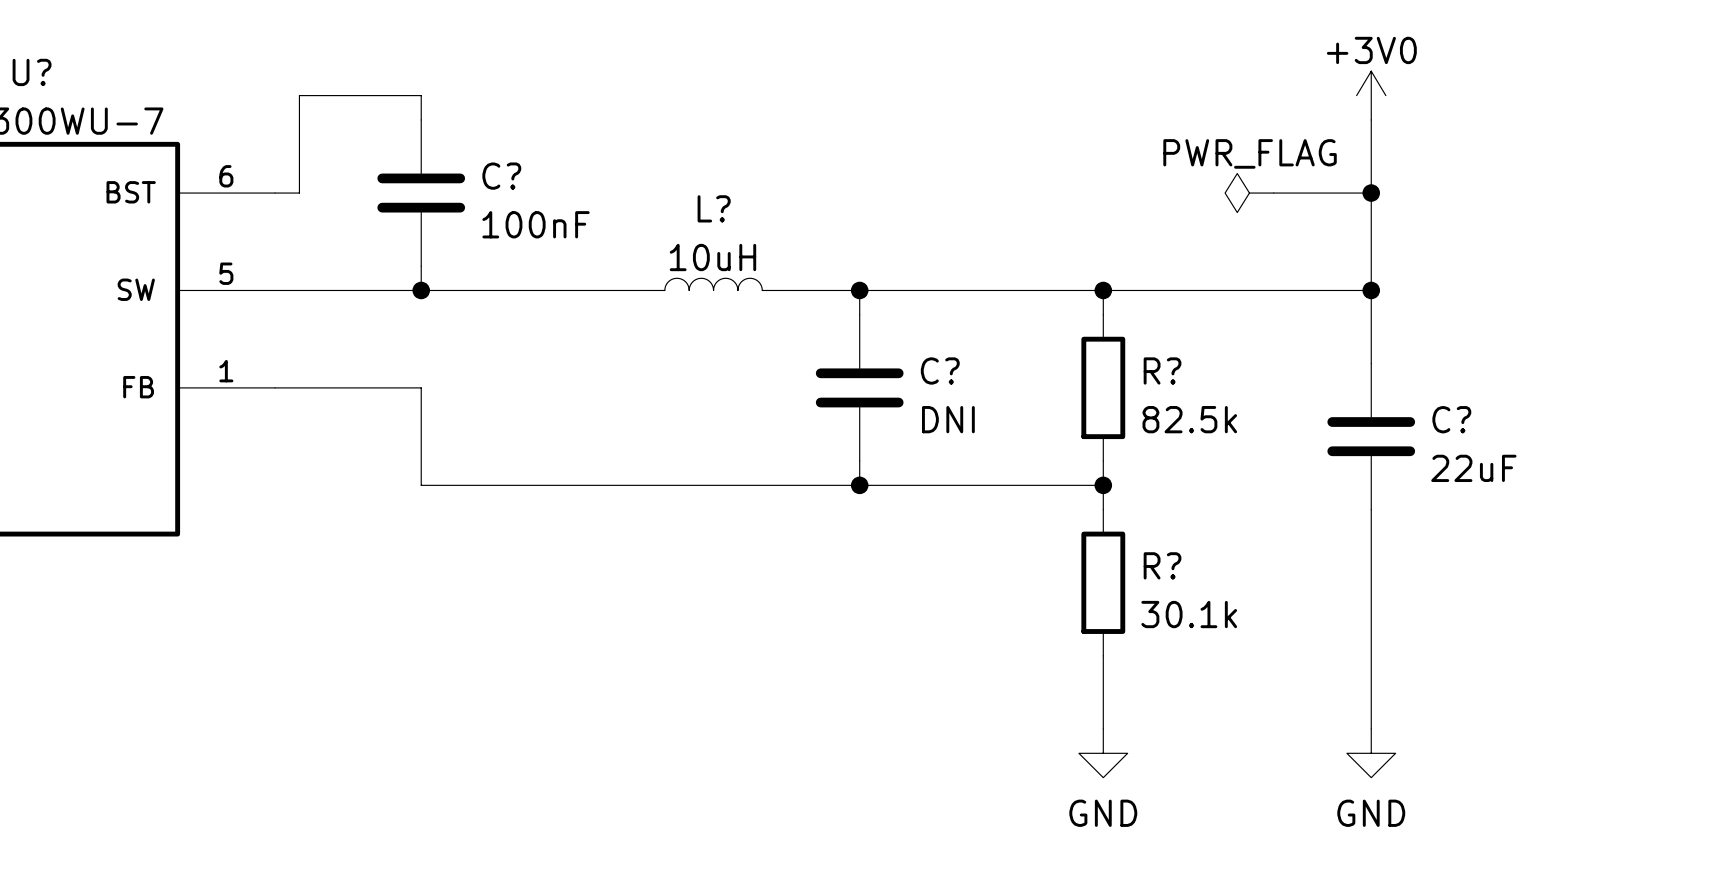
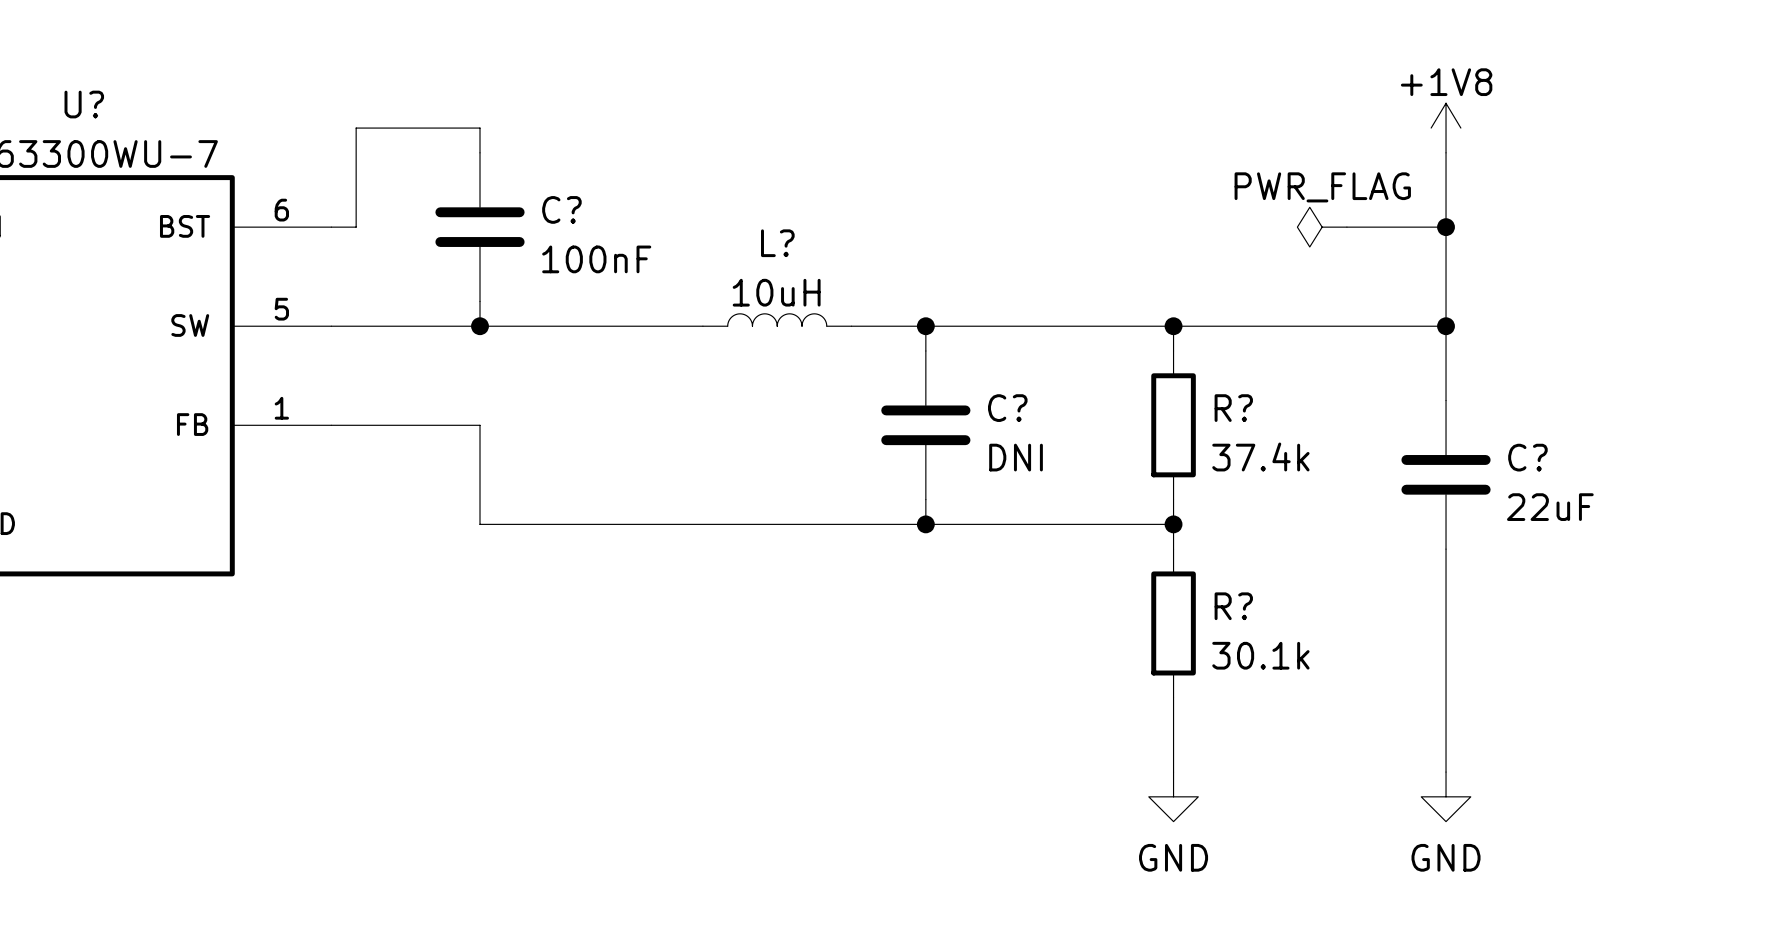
power symbol: +3V0 (1371, 95) -> +1V8 (1446, 128)
R? value: 82.5k (1189, 419) -> 37.4k (1260, 456)

